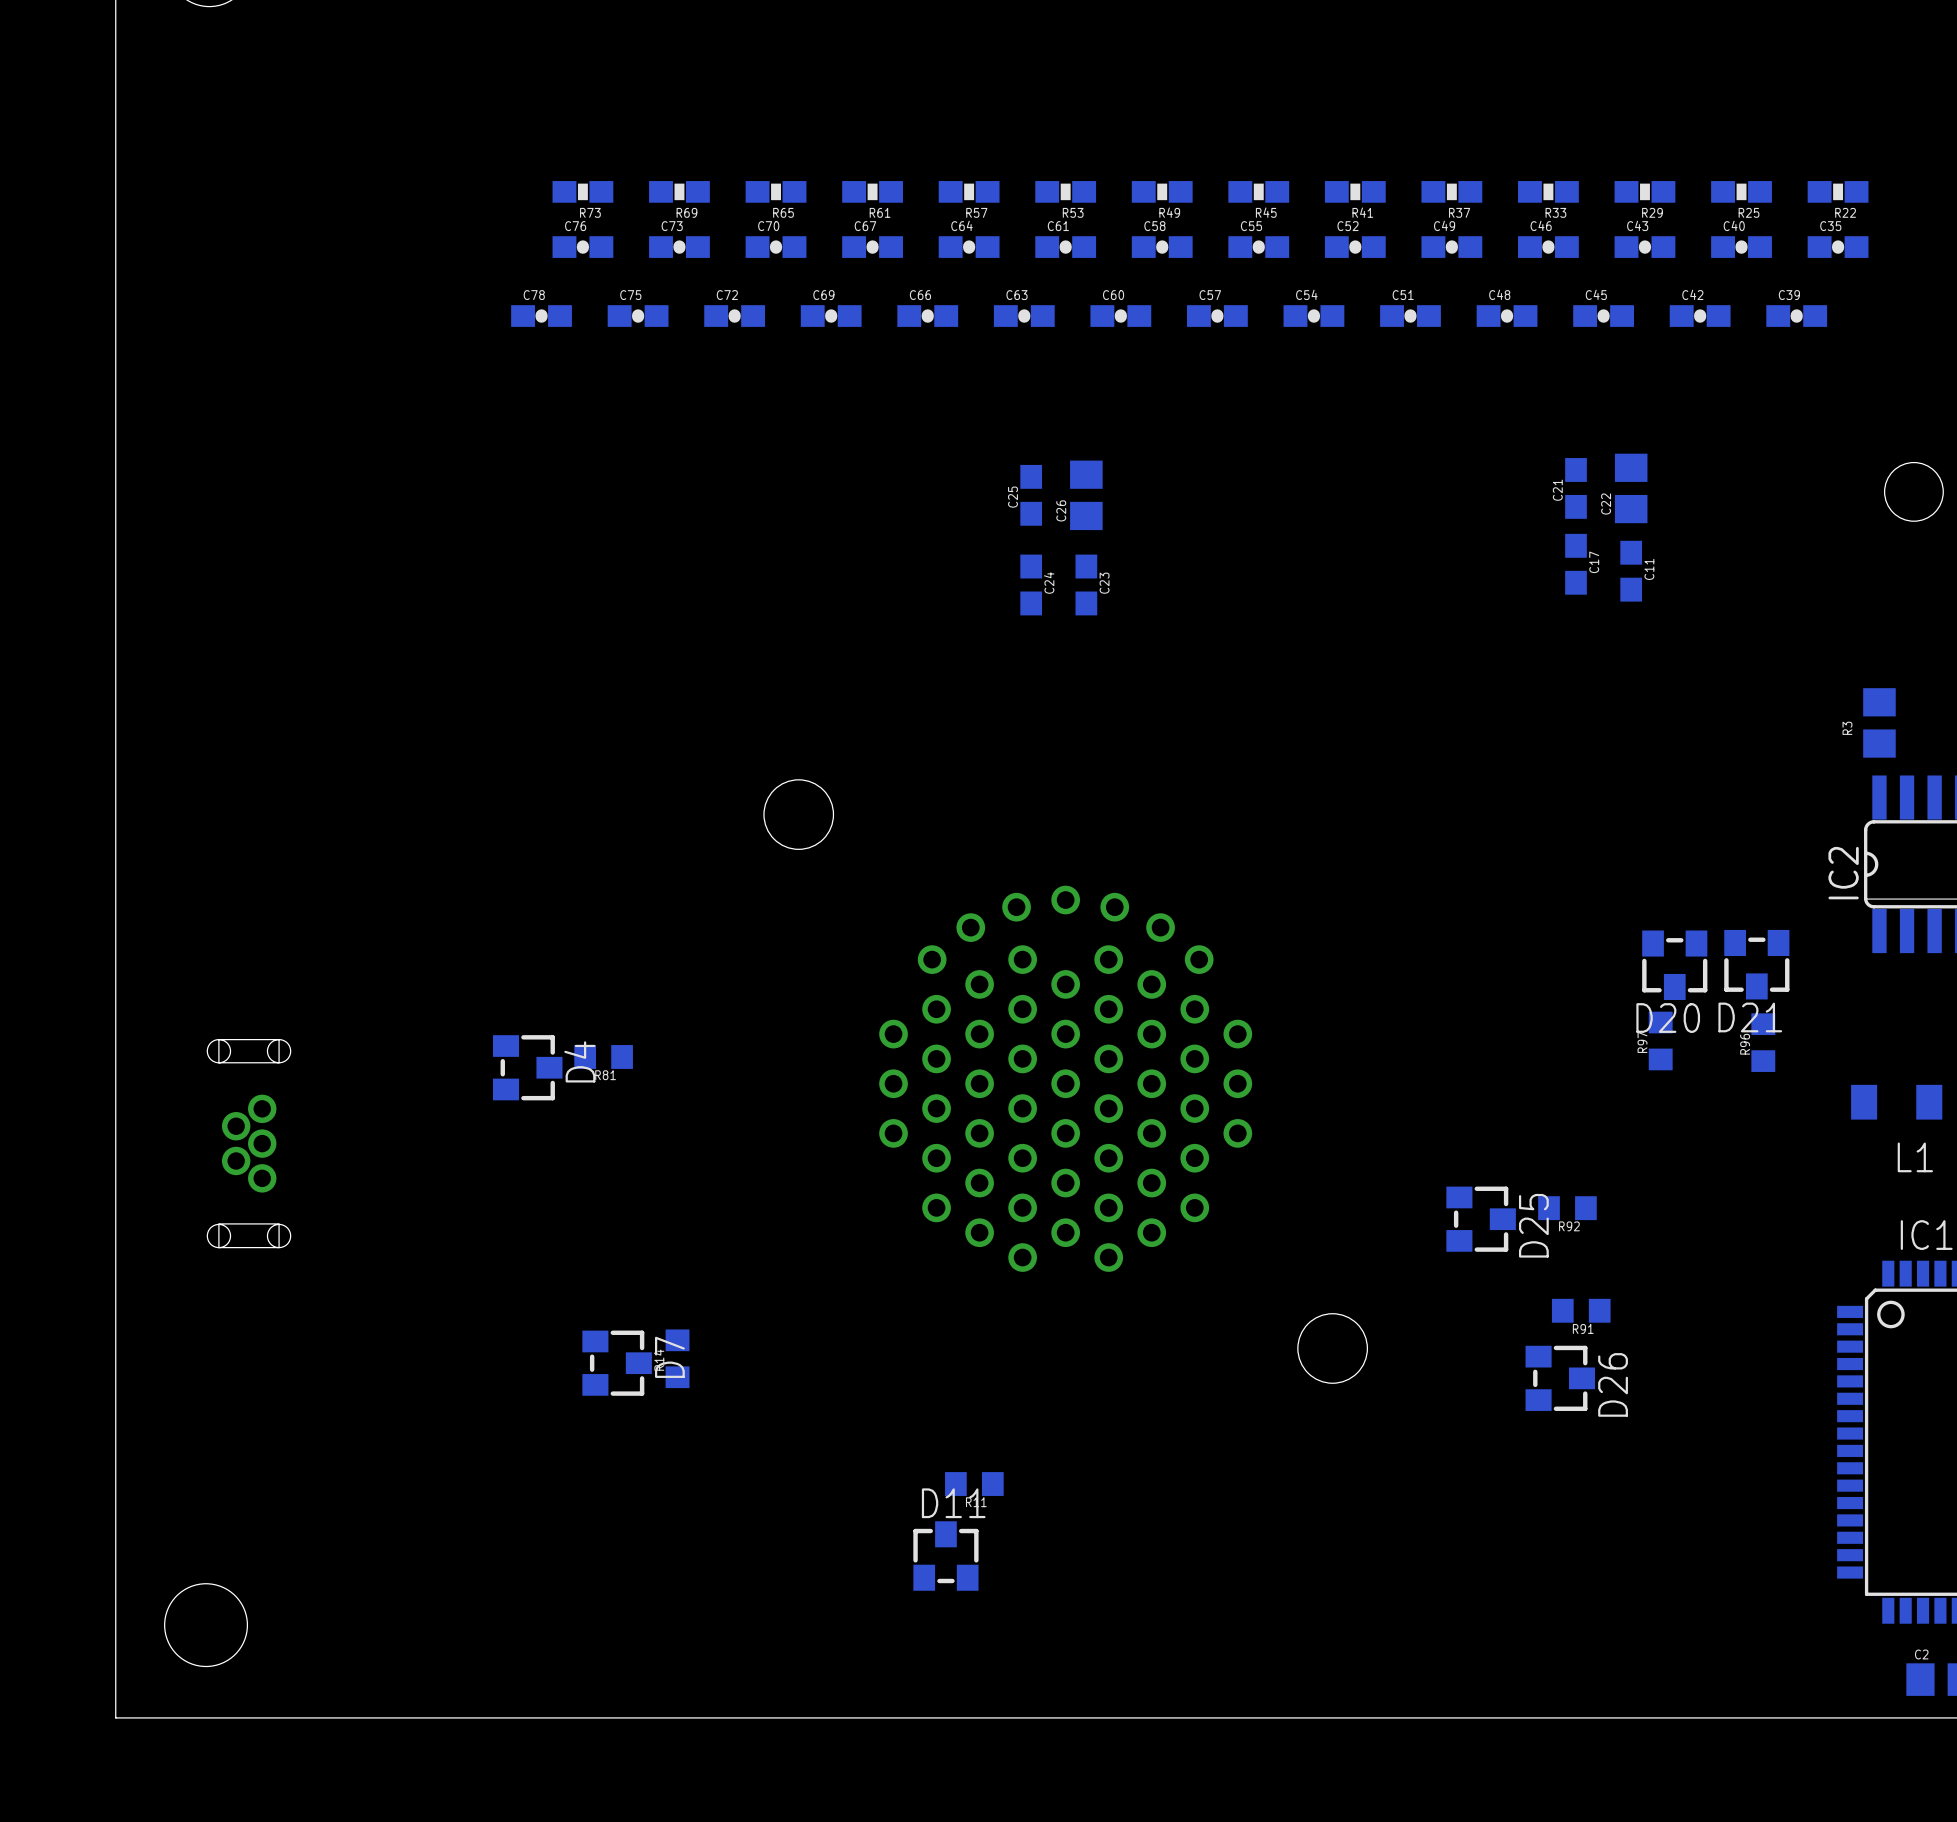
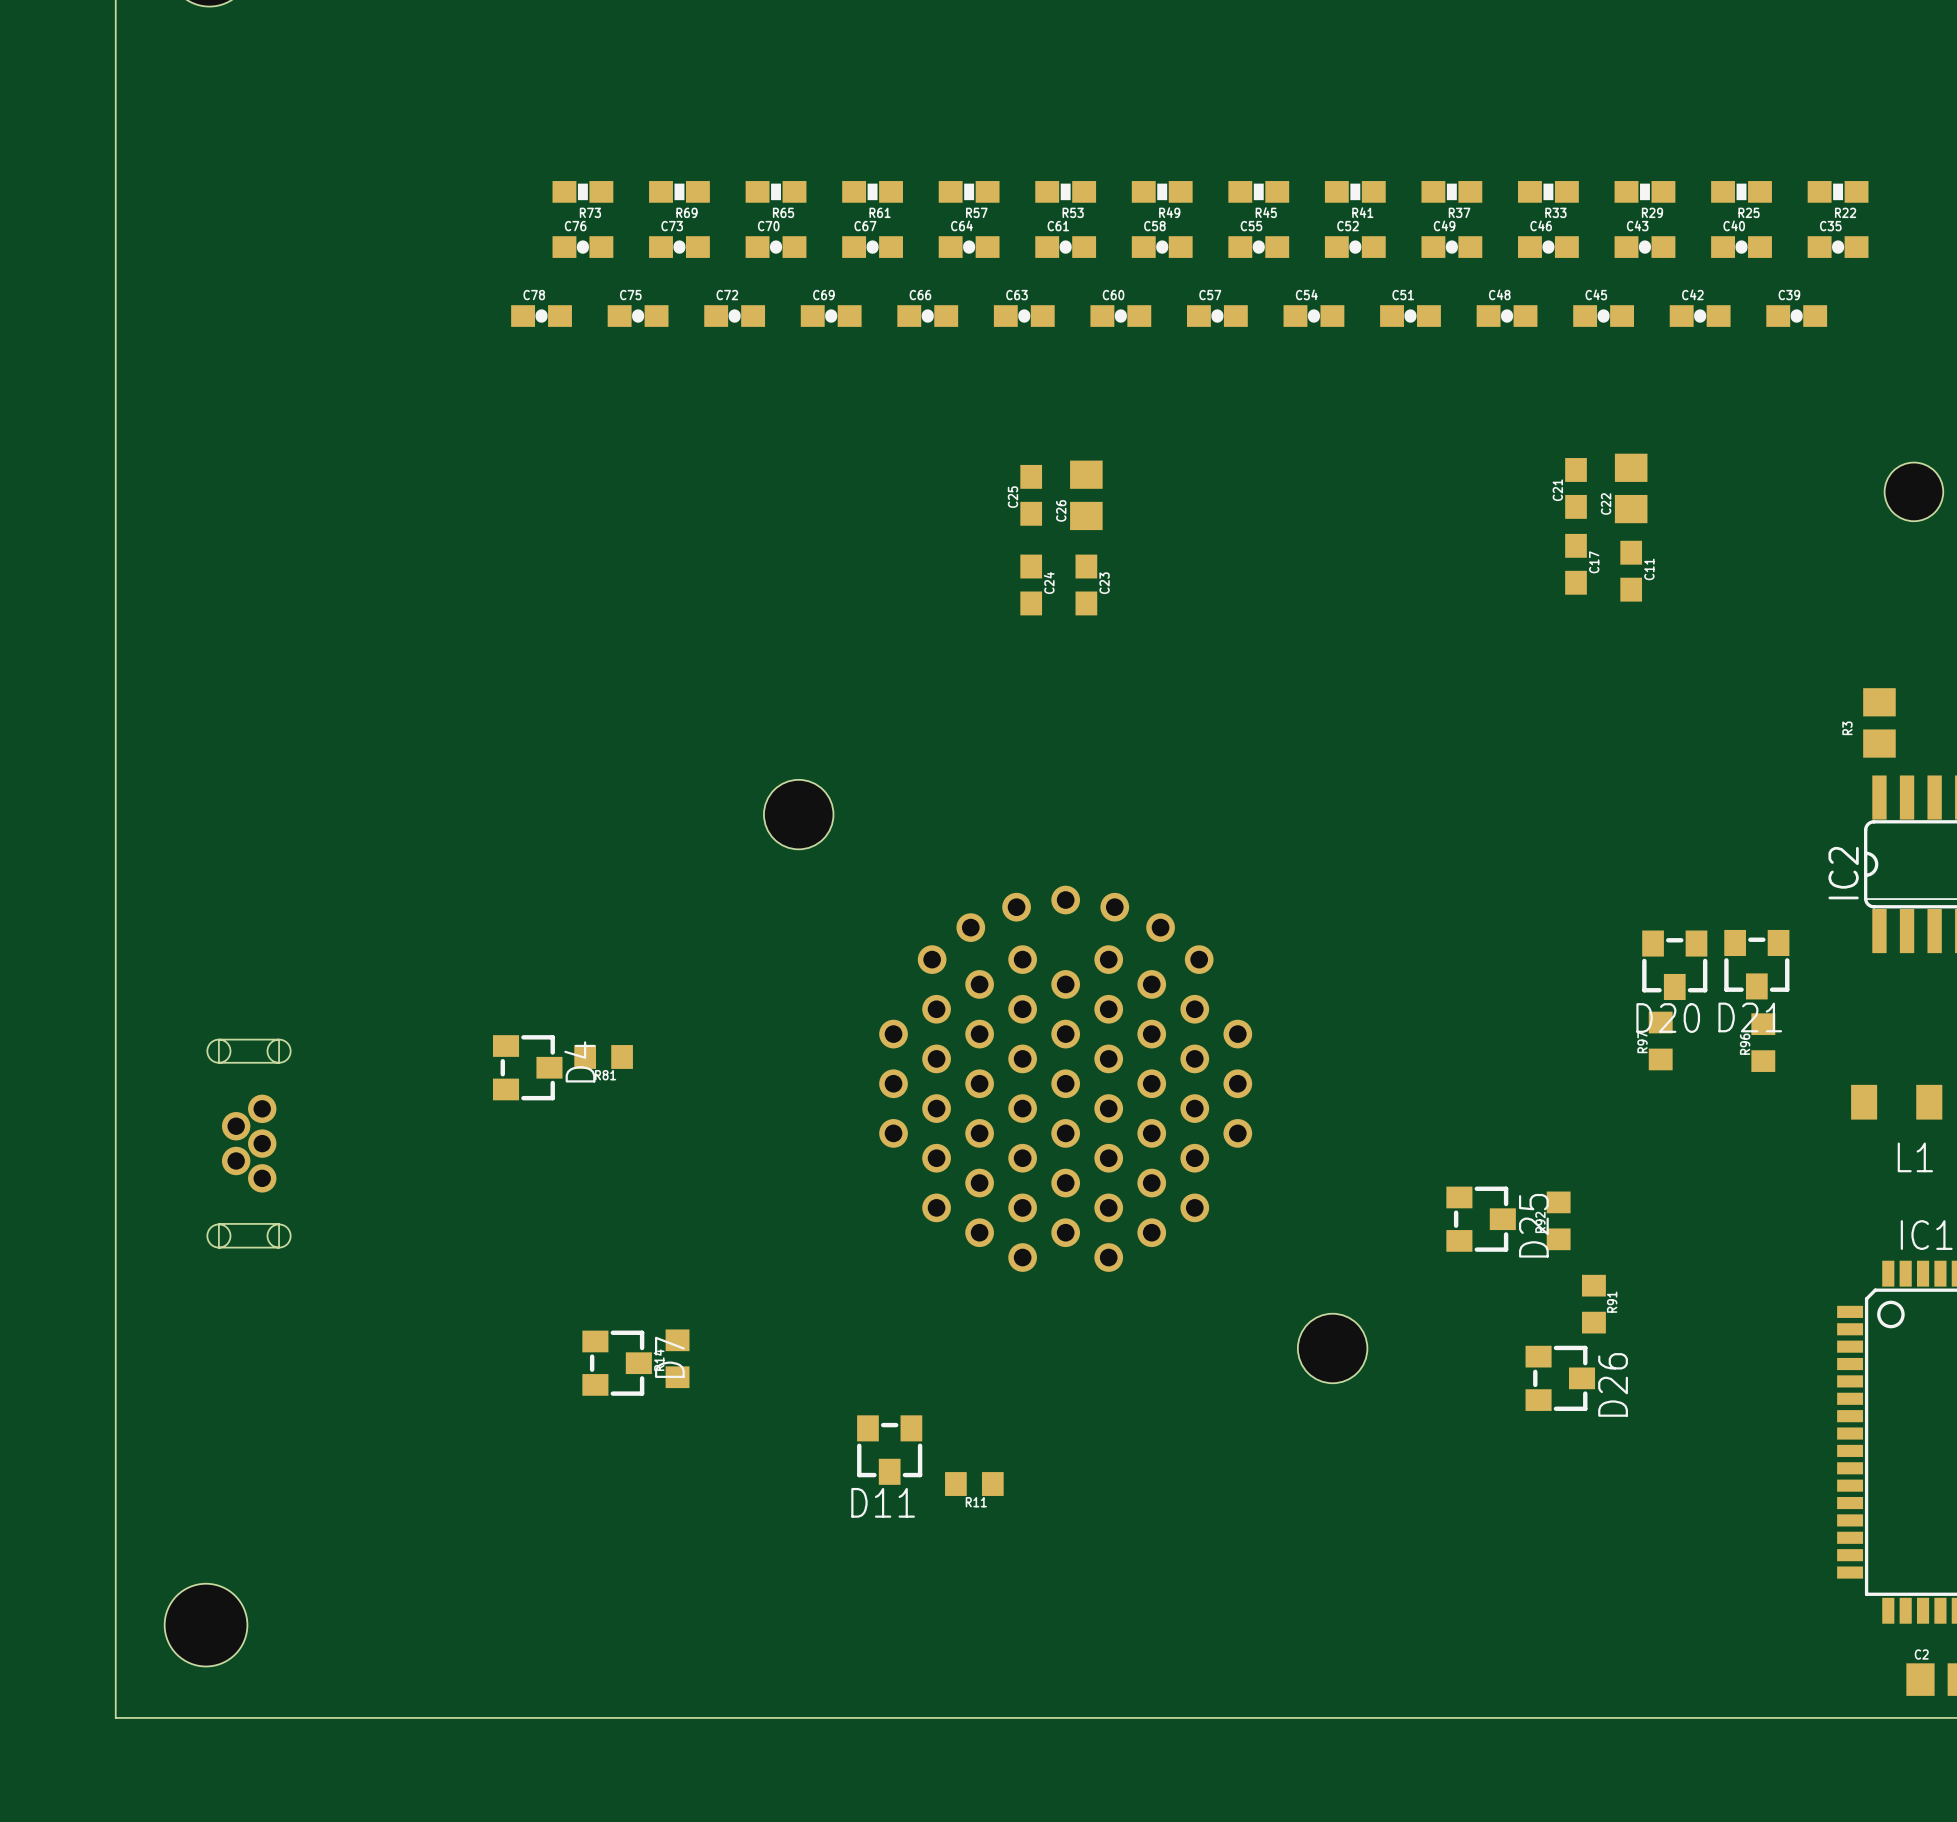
R92 rotation: 0° (1567, 1208) -> 90° clockwise (1558, 1220)
R91 rotation: 0° (1581, 1310) -> 90° clockwise (1593, 1304)
D11 rotation: 0° (945, 1556) -> 180° (889, 1450)
D11 position: (945, 1556) -> (889, 1450)

